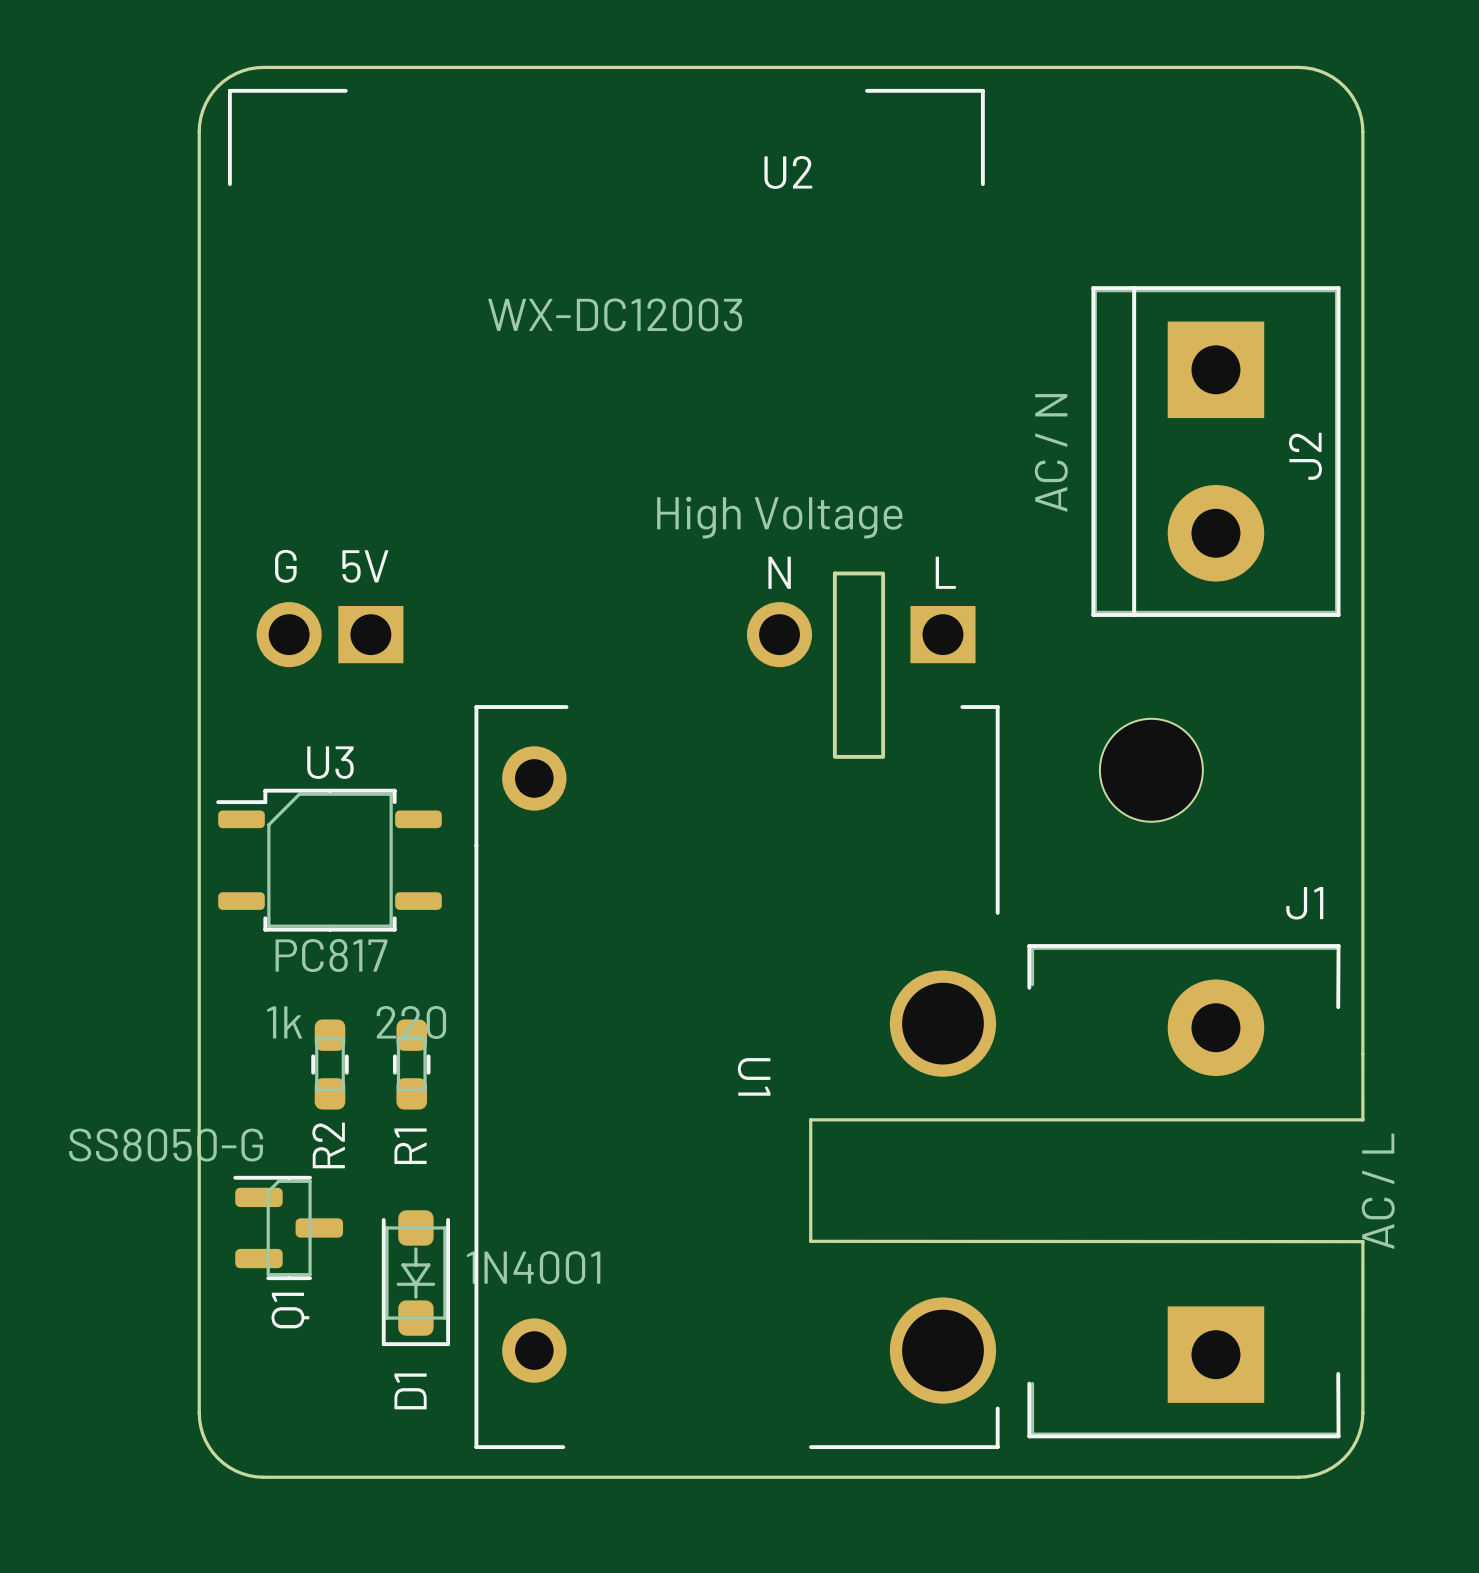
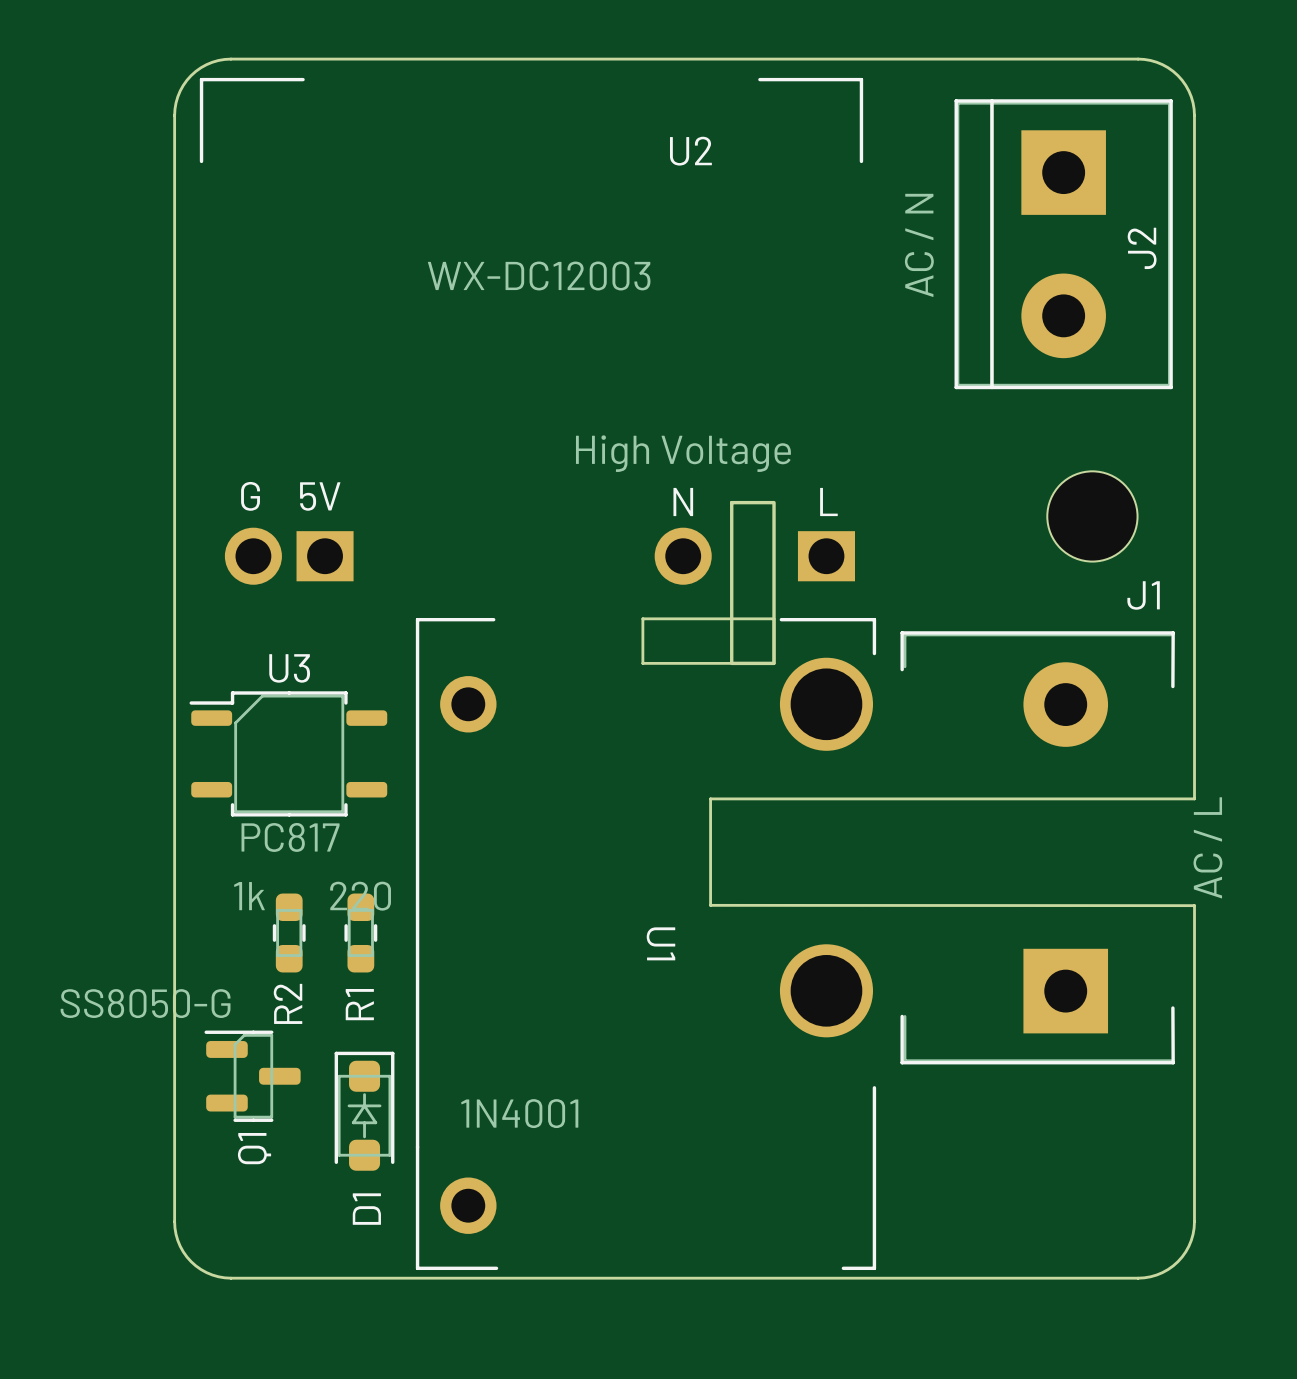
J2 position: (1215, 451) -> (1063, 244)
U1 footprint: [474, 705, 1000, 1450] -> [415, 617, 877, 1271]
board edge: none -> (642, 618) (774, 618) (774, 663) (642, 663) (642, 618)
part position: (1151, 770) -> (1092, 516)
board edge: (1362, 911) (1362, 1119) (810, 1119) (810, 1241) (1362, 1241) (1362, 1420) (1359, 1434) (1352, 1447) (1344, 1458) (1326, 1470) (1312, 1475) (1298, 1477) (256, 1476) (242, 1473) (229, 1467) (218, 1458) (209, 1447) (200, 1427) (199, 1394) -> (1194, 798) (710, 798) (710, 905) (1194, 905) (1194, 1228) (1191, 1240) (1182, 1256) (1162, 1272) (1138, 1278) (231, 1278) (212, 1275) (191, 1261) (177, 1240) (174, 1221)
J1 position: (1183, 1191) -> (1037, 847)
D1 rotation: 0° (415, 1278) -> 180° (364, 1111)

